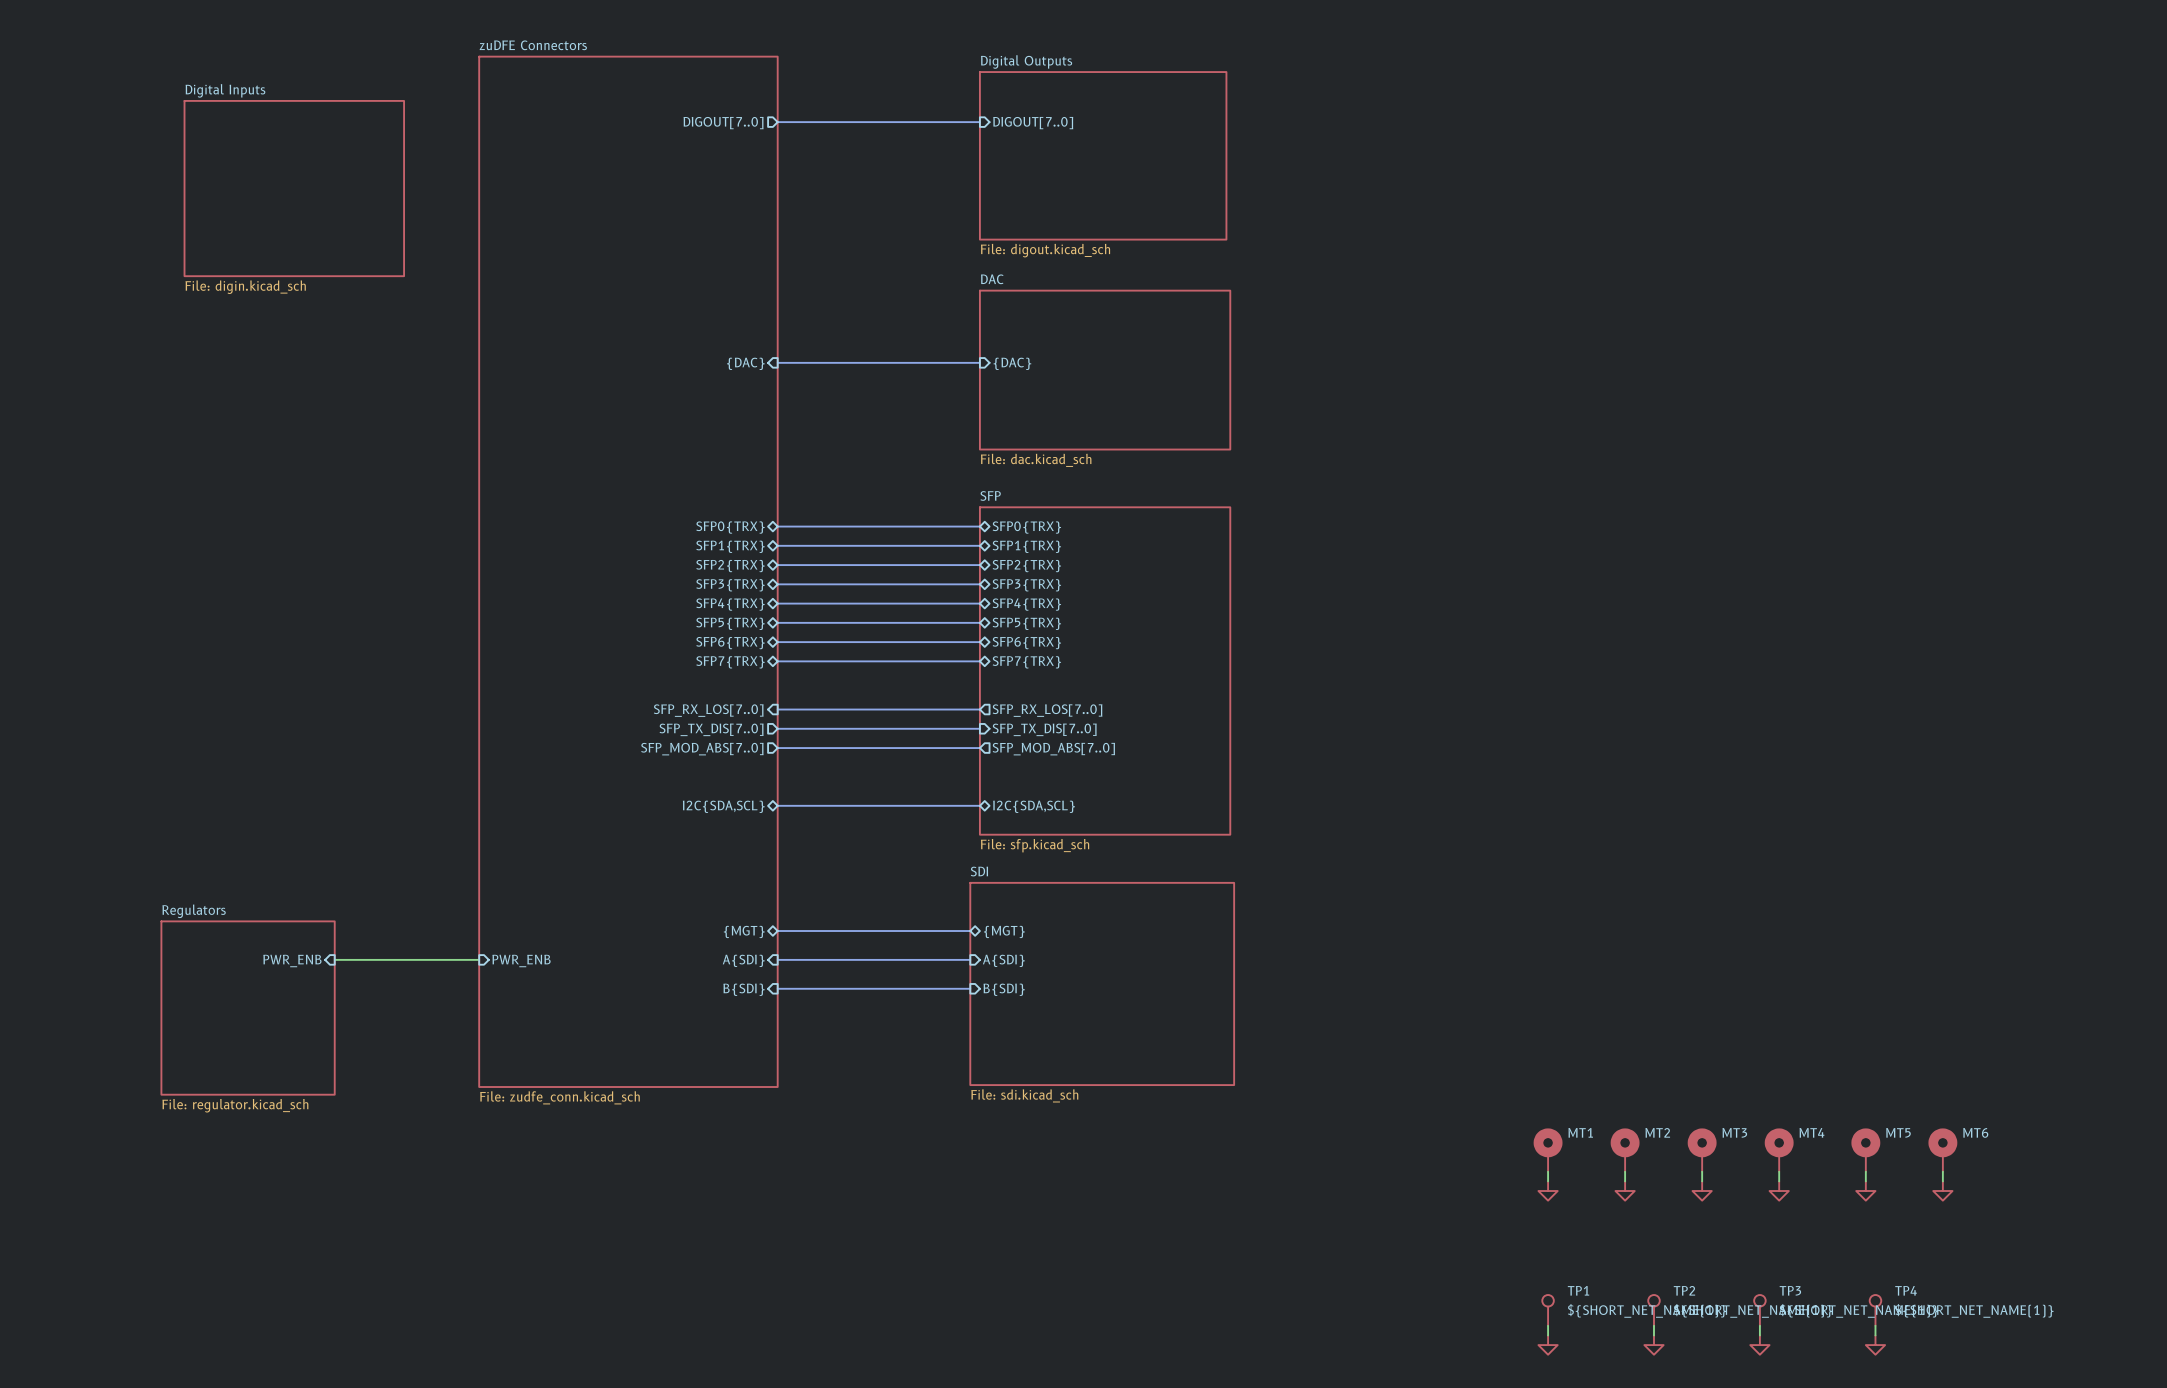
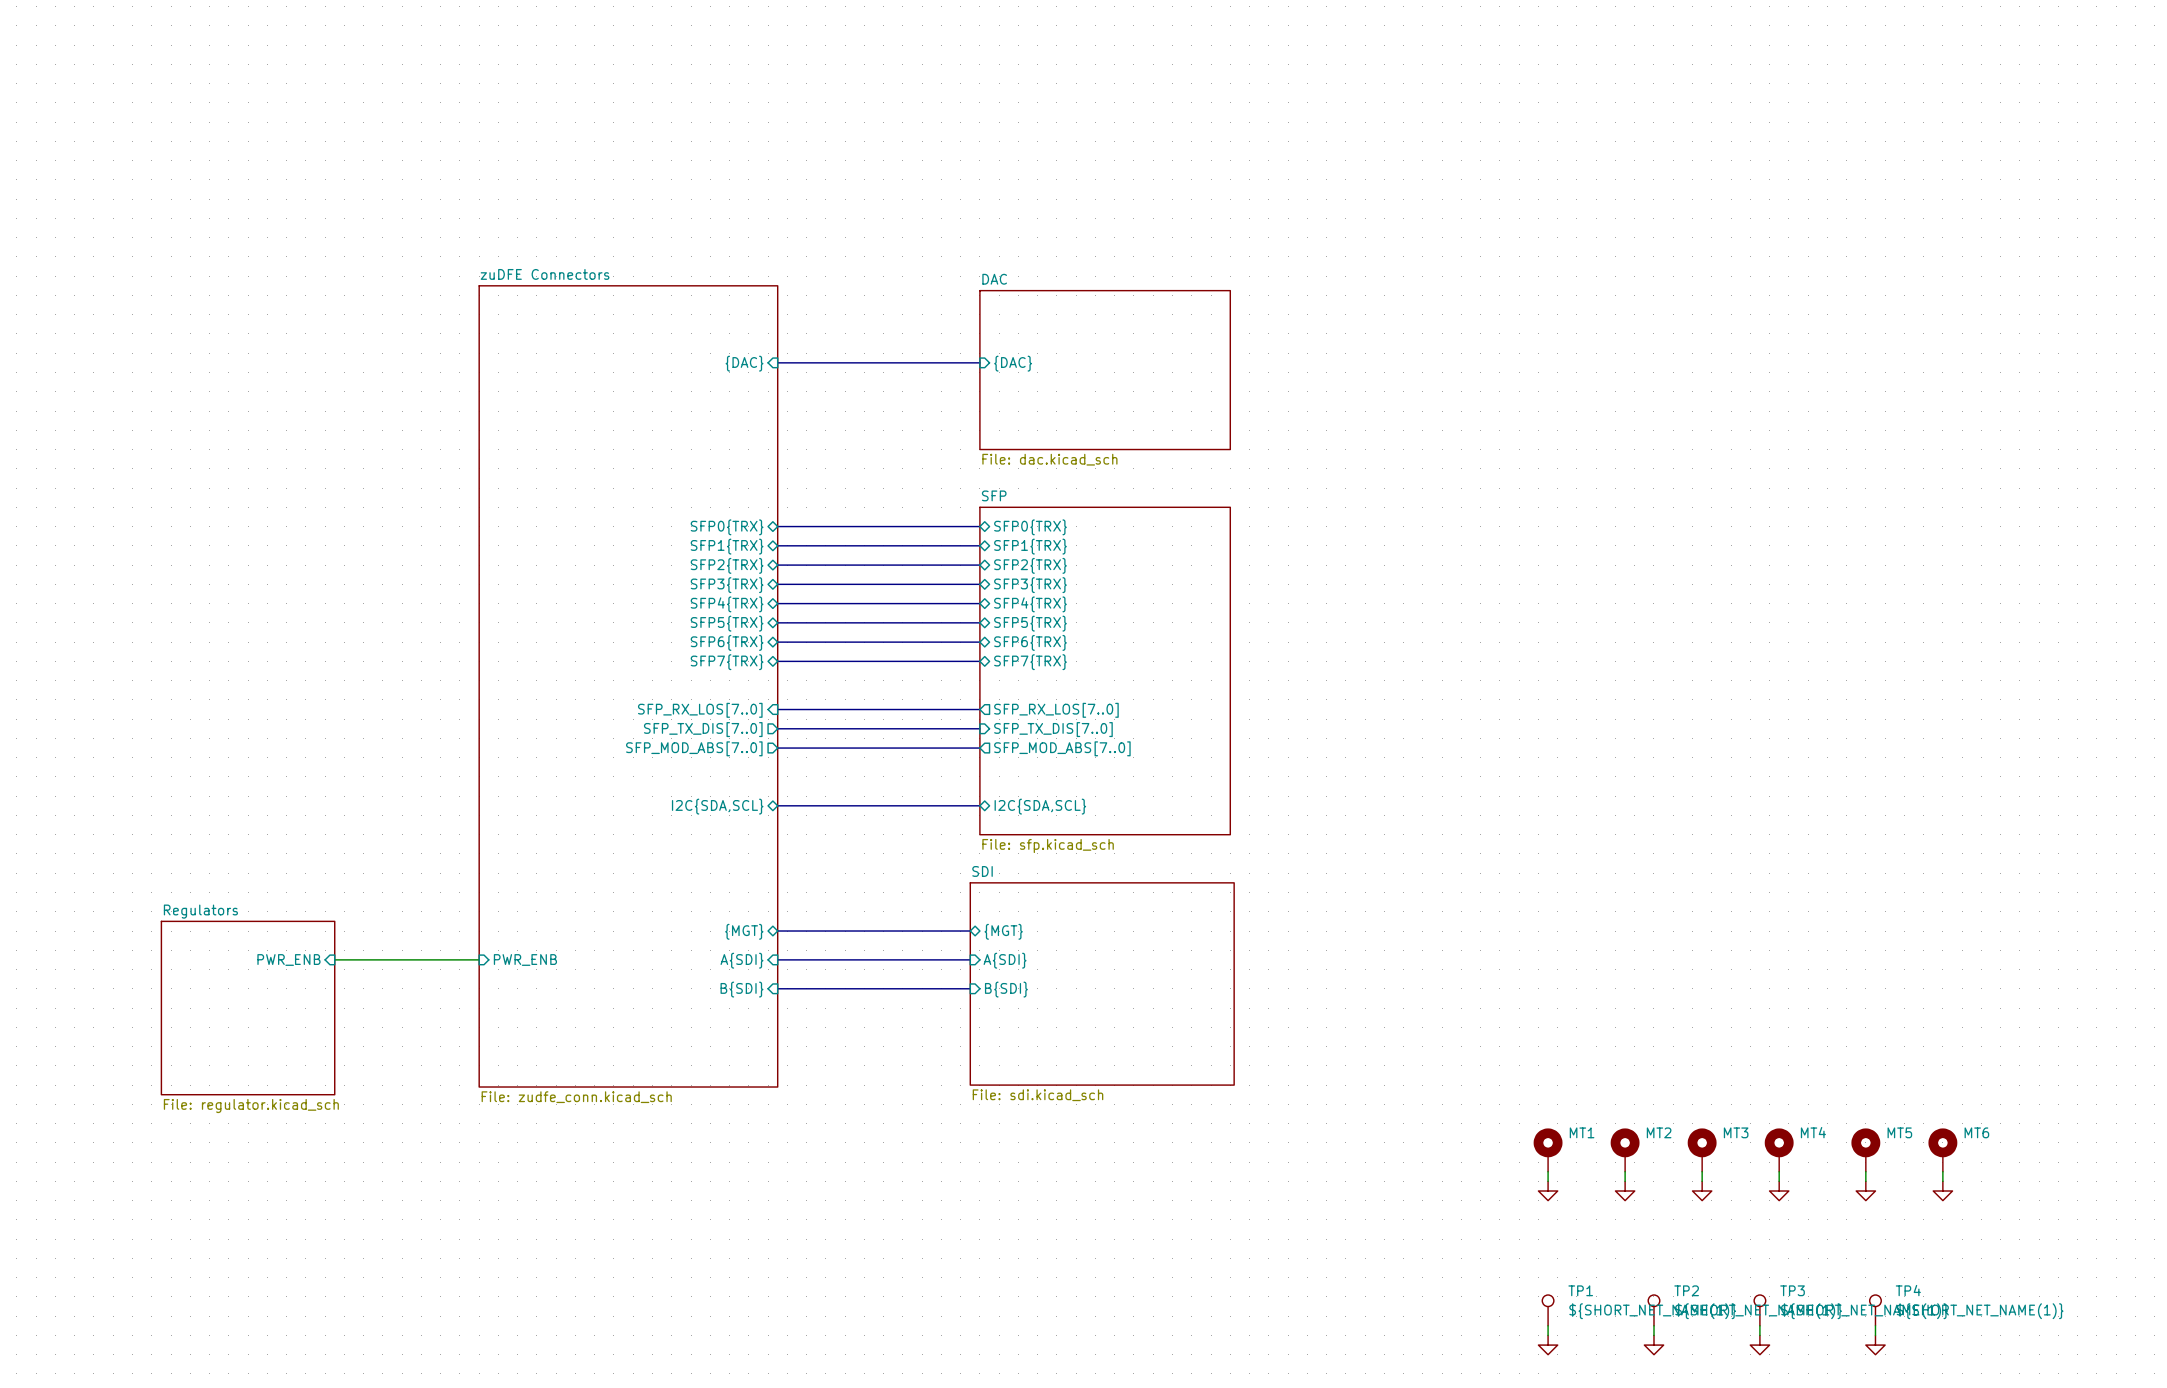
bus: (777, 122) (979, 122) -> none
sheet pin: DIGOUT[7..0] (723, 123) -> none
sheet pin: DIGOUT[7..0] (1033, 123) -> none
sheet Digital Outputs: File: digout.kicad_sch (1103, 155) -> none
sheet Digital Inputs: File: digin.kicad_sch (294, 188) -> none
sheet zuDFE Connectors: File: zudfe_conn.kicad_sch (628, 571) -> none
sheet zuDFE Connectors: none -> File: zudfe_conn.kicad_sch (628, 686)

